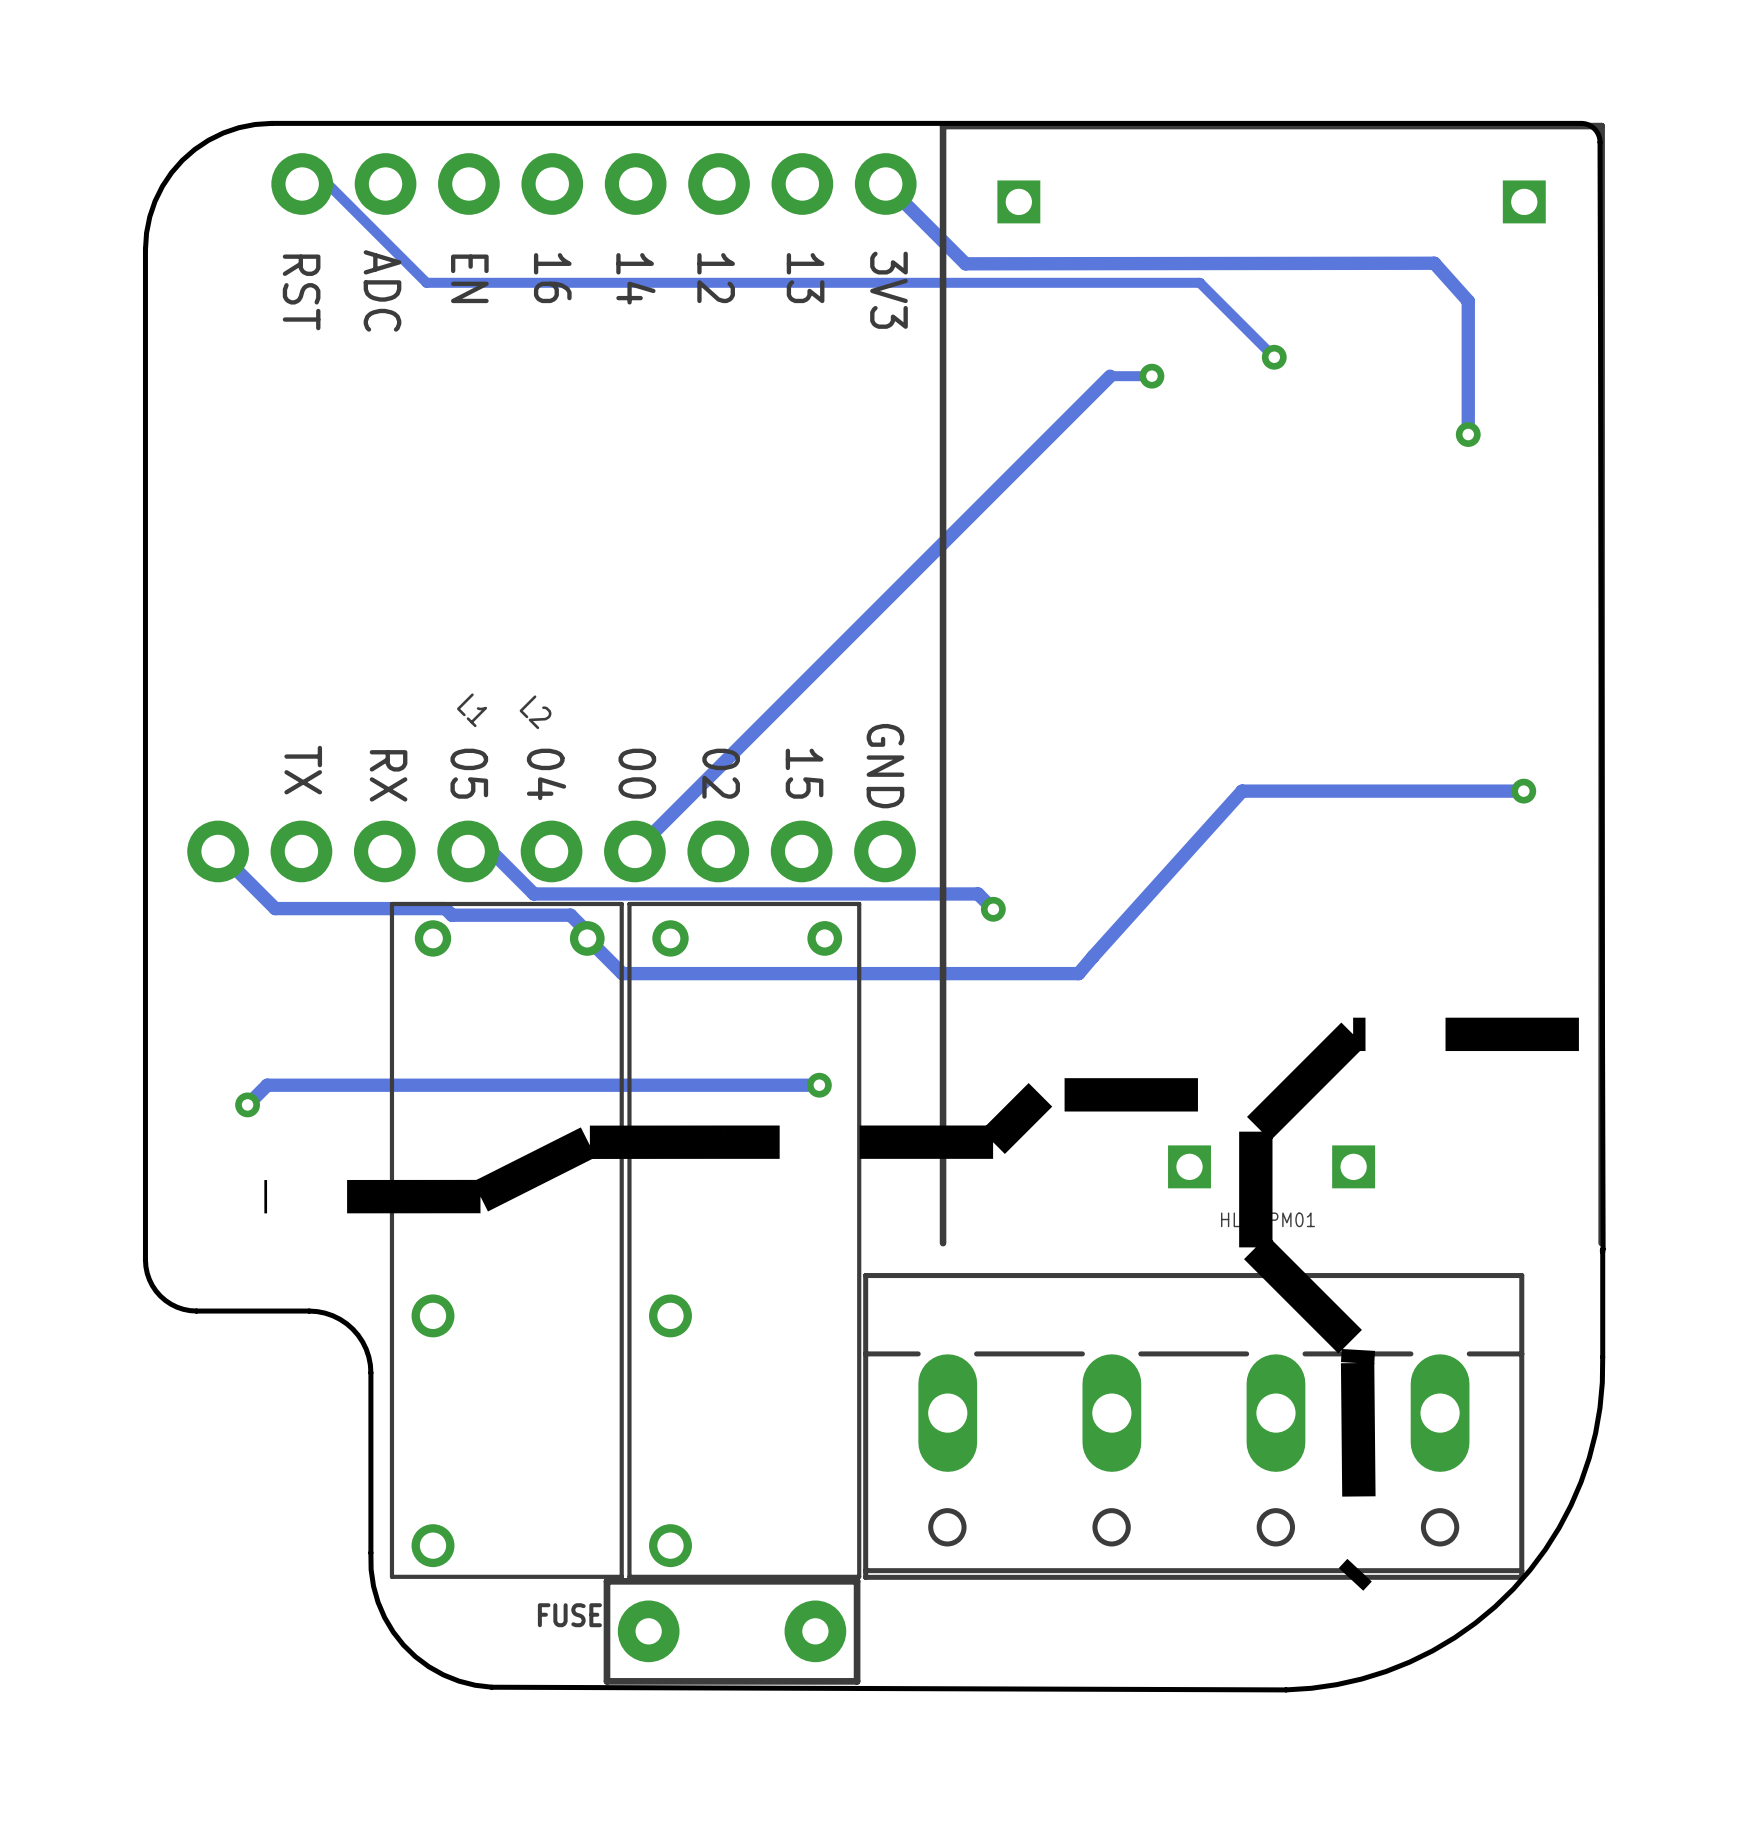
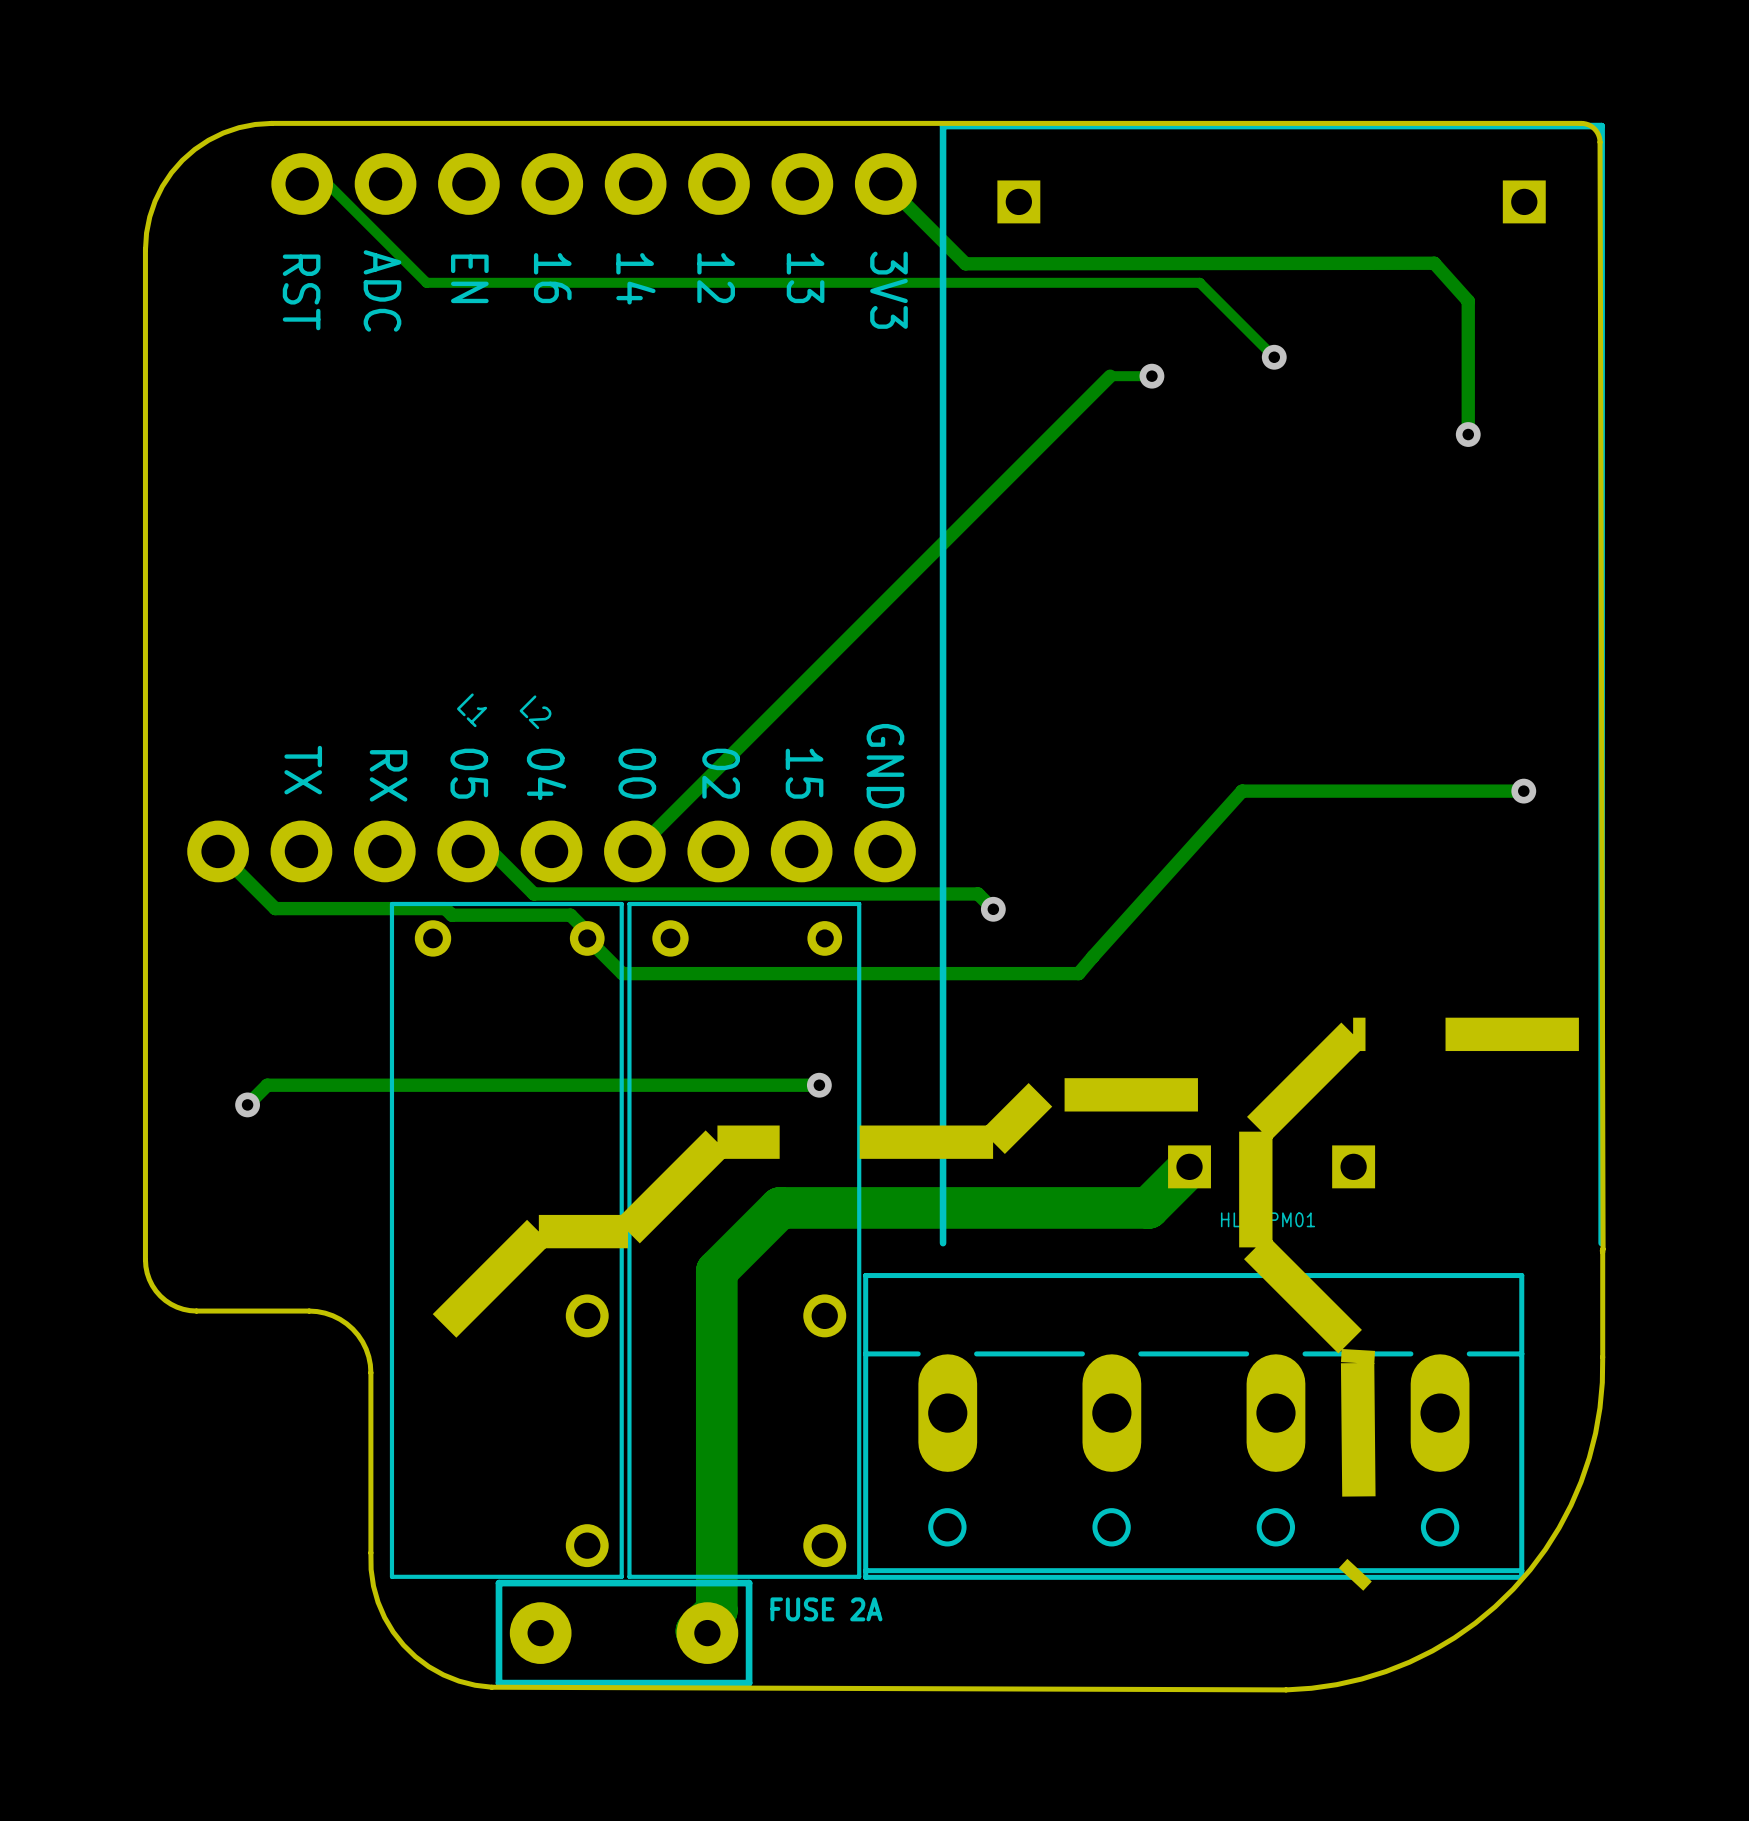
part footprint: [389, 901, 624, 1579] -> [389, 901, 624, 1579]
part footprint: [627, 901, 862, 1579] -> [627, 901, 862, 1579]
board edge: (723, 1142) (588, 1142) (480, 1196) (264, 1196) -> (723, 1142) (717, 1142) (628, 1231) (538, 1231) (423, 1347)
track: none -> (1189, 1166) (1148, 1207) (780, 1207) (716, 1271) (716, 1610) (696, 1631) (698, 1633) (707, 1633)
part: FUSE (732, 1631) -> none
part: none -> FUSE 2A (624, 1633)

